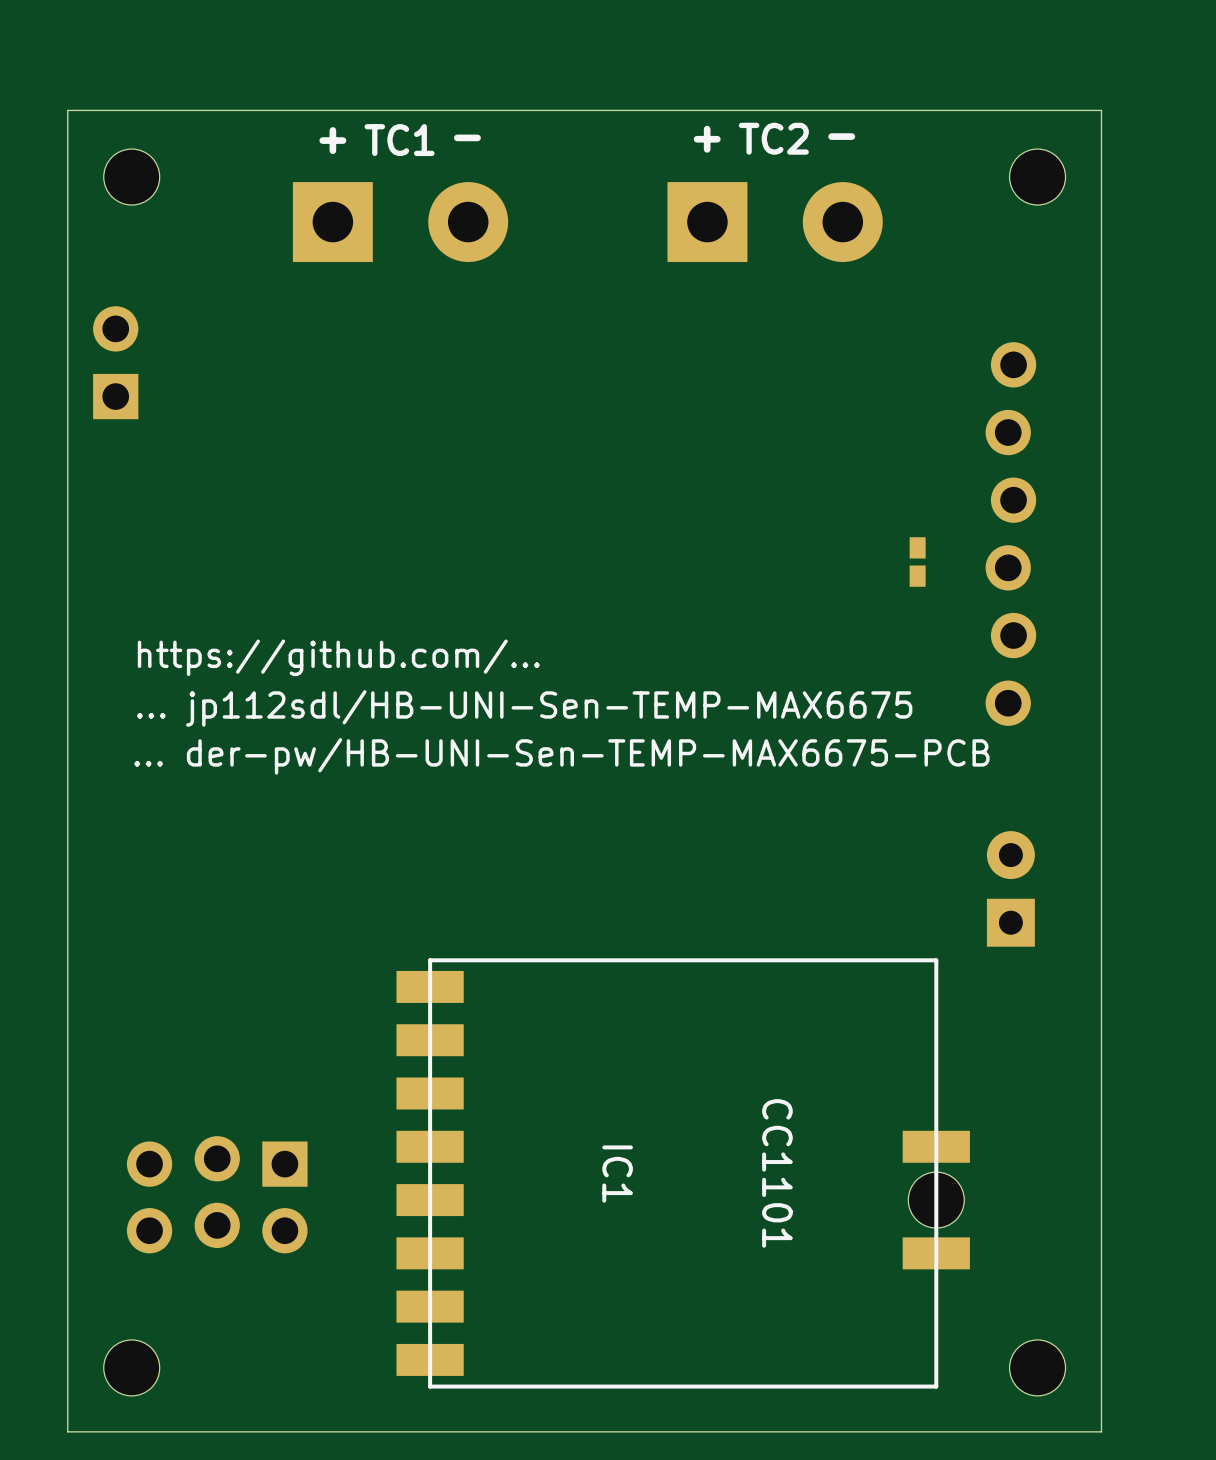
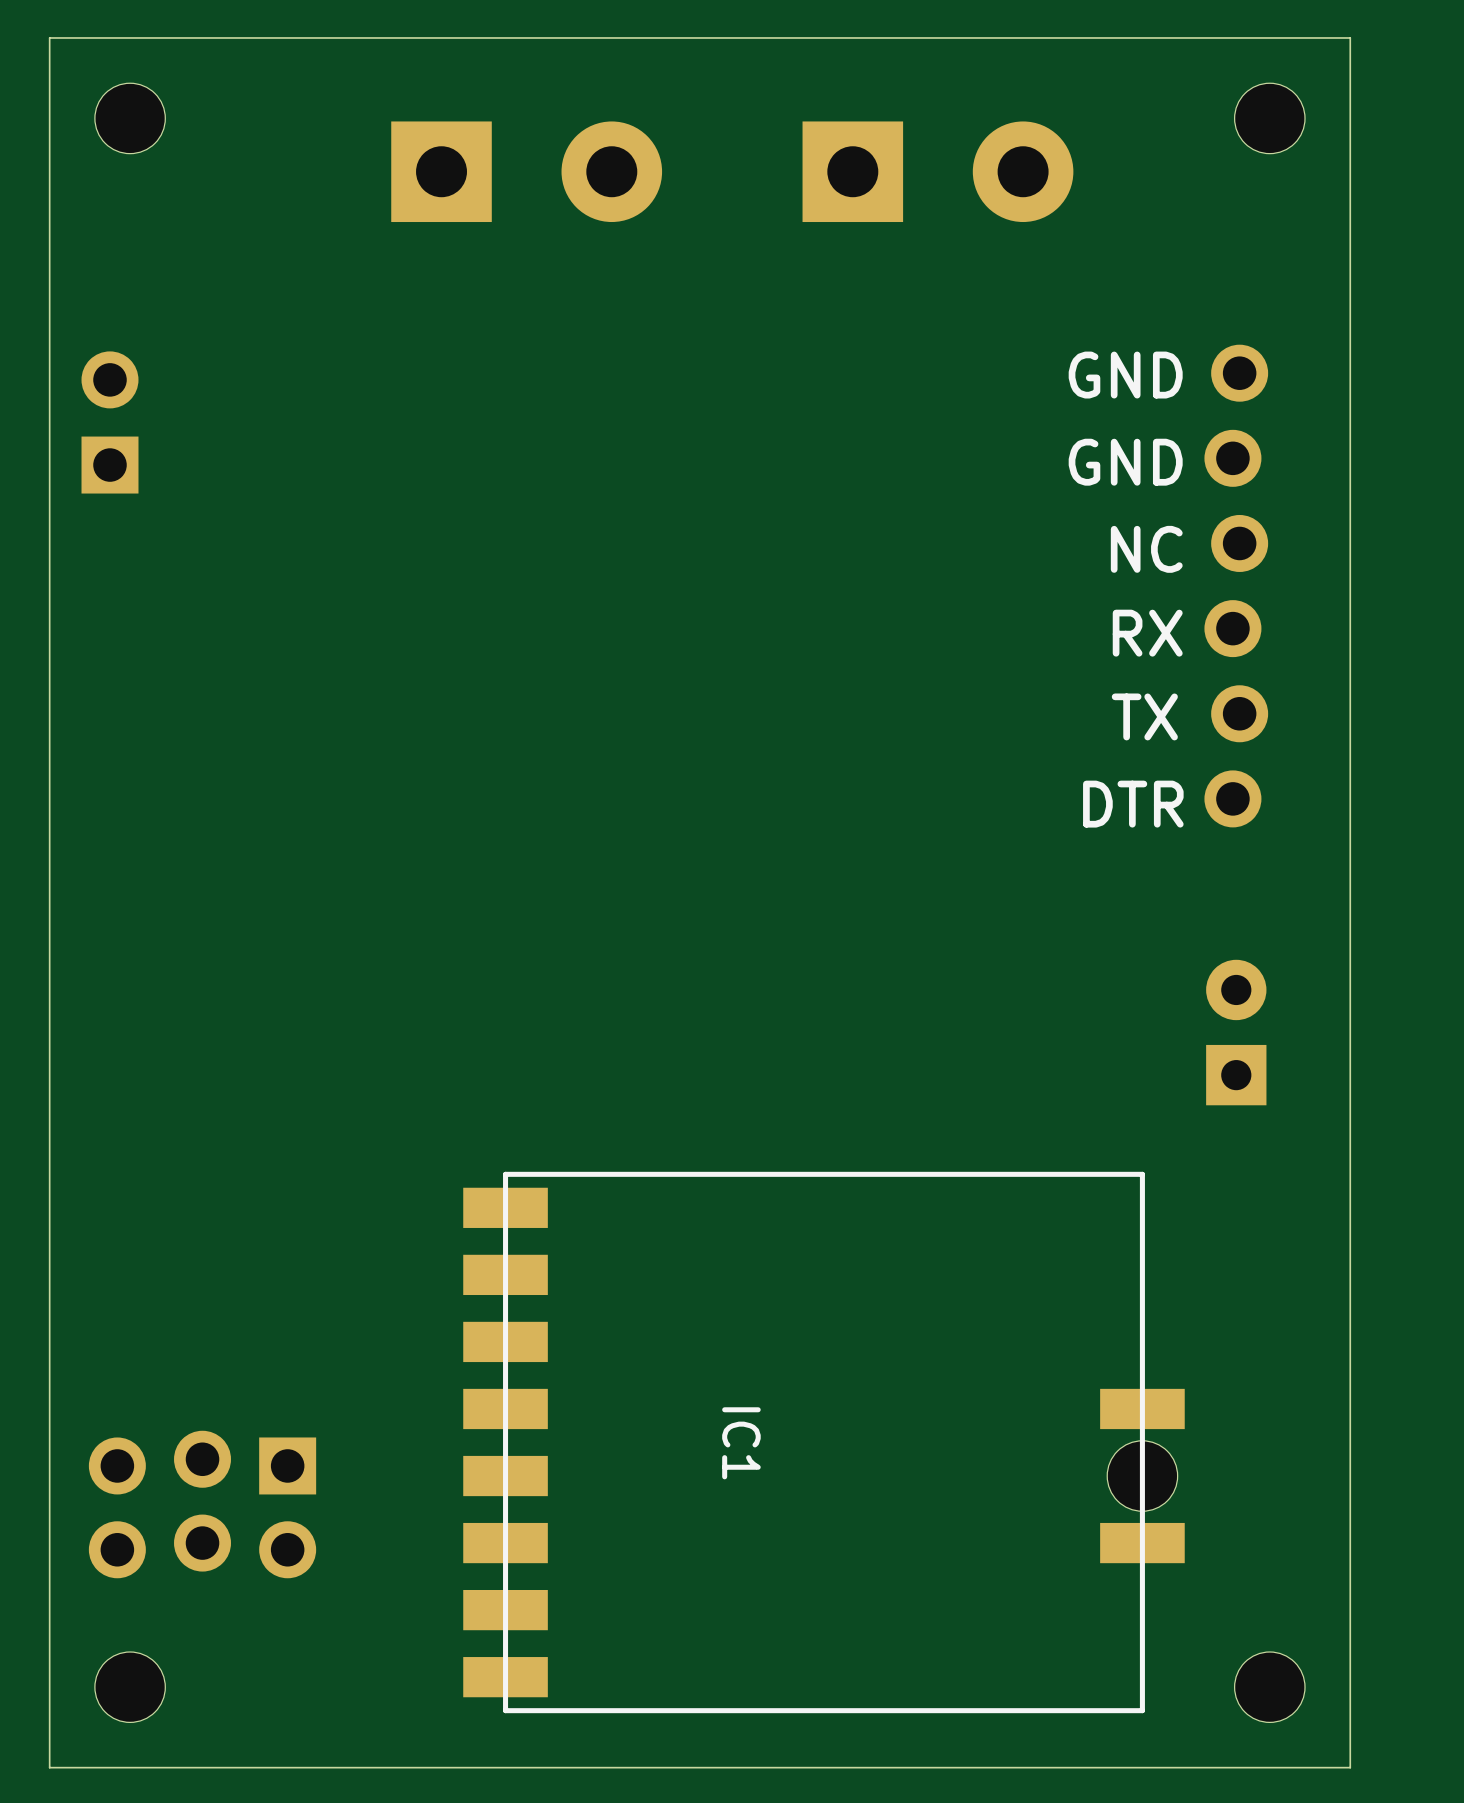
board edge: (1101, 110) (67, 110) -> (1350, 105) (1350, 37) (49, 37) (49, 105)
text: - (841, 136) -> none
text: - (467, 137) -> none
text: TC2 (773, 138) -> none
text: + (707, 139) -> none
text: + (332, 140) -> none
text: TC1 (399, 140) -> none
part position: (131, 177) -> (130, 118)
part position: (1037, 177) -> (1269, 118)
part position: (400, 222) -> (526, 171)
part position: (775, 222) -> (937, 171)
text: none -> GND (1125, 375)
text: none -> GND (1125, 462)
text: none -> NC (1146, 549)
text: none -> RX (1147, 633)
part position: (1010, 534) -> (1236, 586)
part: (917, 562) -> none
text: none -> TX (1144, 716)
text: https://github.com/... (338, 657) -> none
text: none -> DTR (1133, 804)
text: ... jp112sdl/HB-UNI-Sen-TEMP-MAX6675 (524, 708) -> none
text: ... der-pw/HB-UNI-Sen-TEMP-MAX6675-PCB (561, 756) -> none
part position: (1010, 888) -> (1236, 1032)
IC1 value: CC1101 (777, 1173) -> none
part position: (217, 1194) -> (202, 1504)

